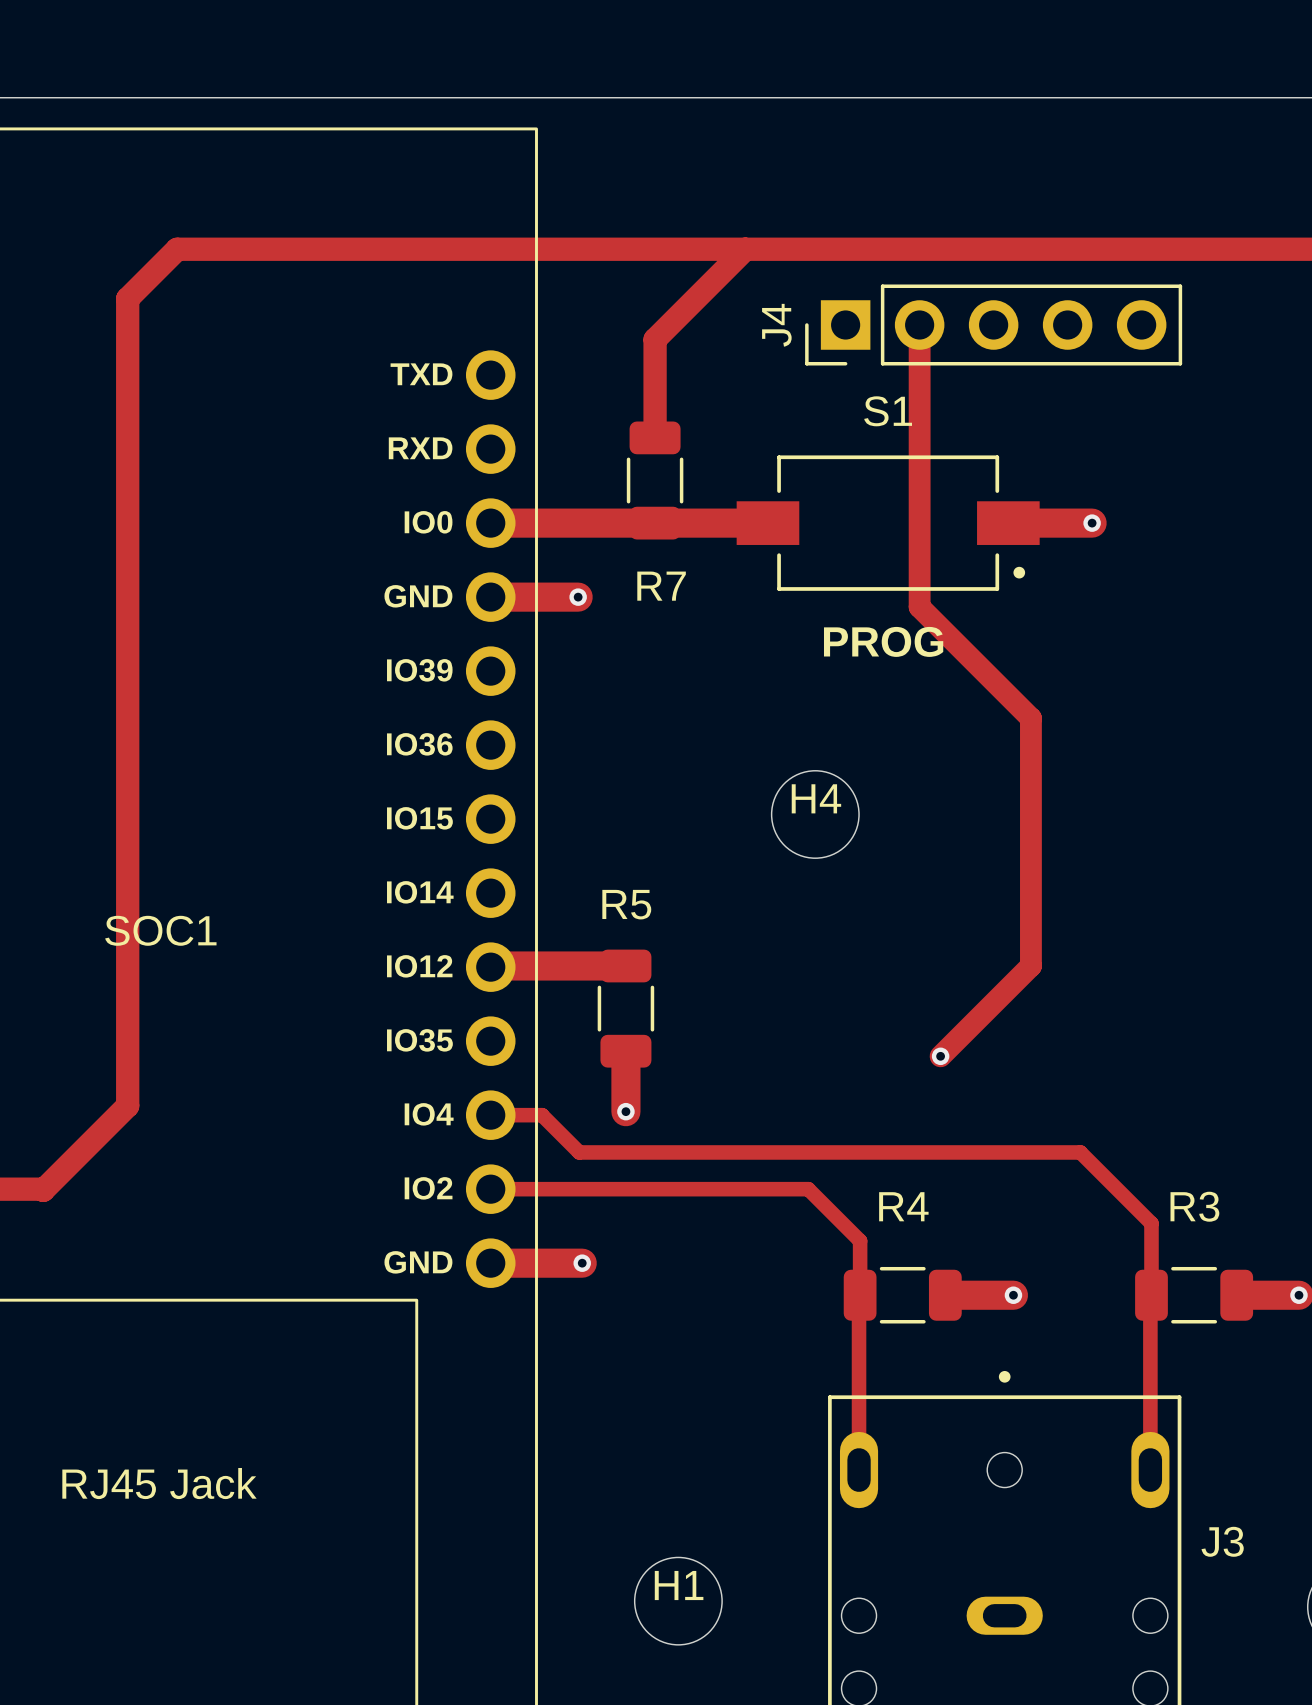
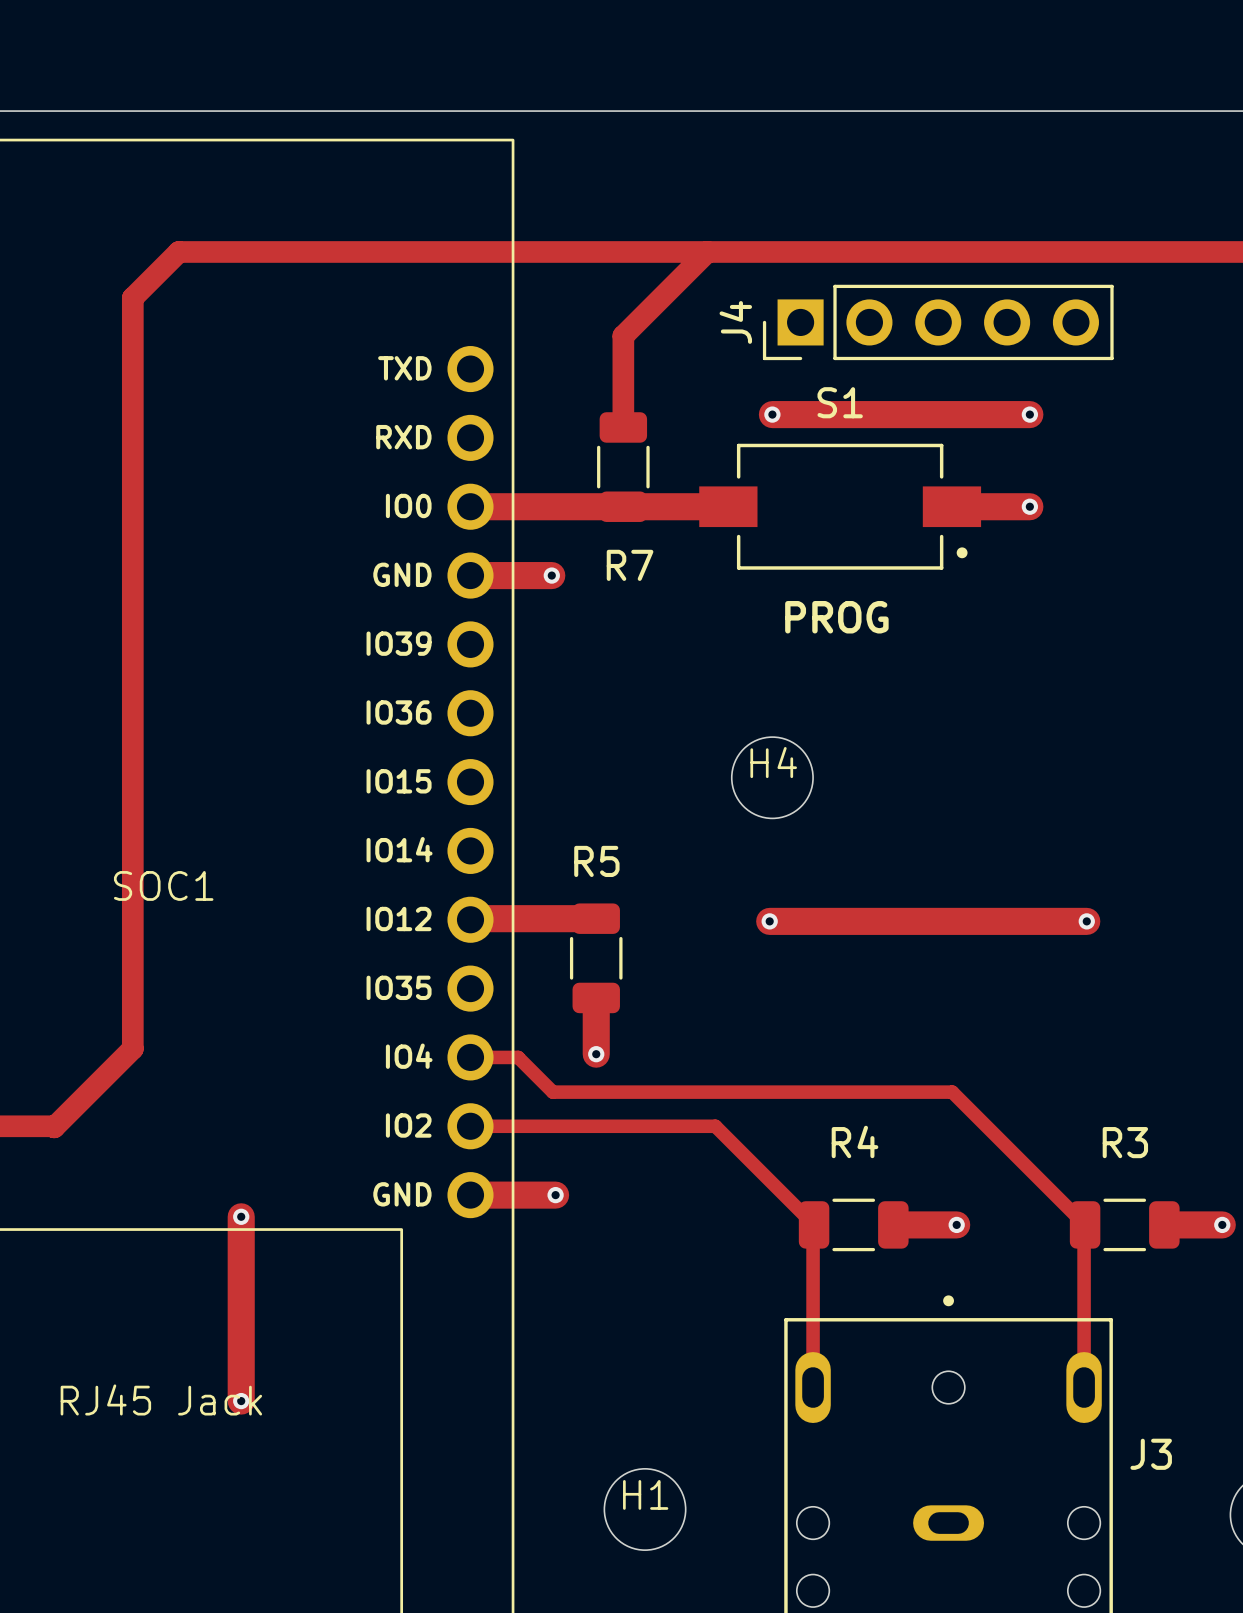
track: (919, 324) (919, 607) (1030, 718) (1030, 965) (940, 1056) -> none
track: none -> (772, 414) (1029, 414)
via: none -> (772, 414)
via: none -> (1029, 414)
track: none -> (769, 921) (1086, 921)
via: none -> (769, 921)
via: none -> (1086, 921)
via: (940, 1056) -> none
track: (1008, 1152) (1080, 1152) (1151, 1223) (1151, 1295) -> (952, 1092) (1085, 1224)
track: (754, 1189) (808, 1189) (860, 1240) (860, 1295) -> (715, 1126) (814, 1224)
track: none -> (241, 1216) (241, 1401)
via: none -> (241, 1216)
via: none -> (241, 1401)

